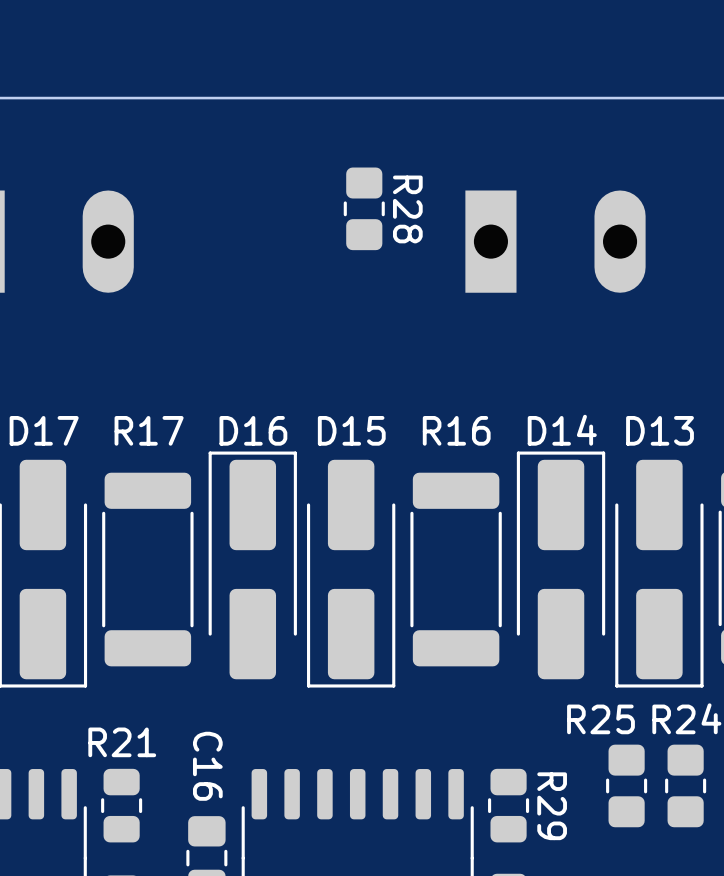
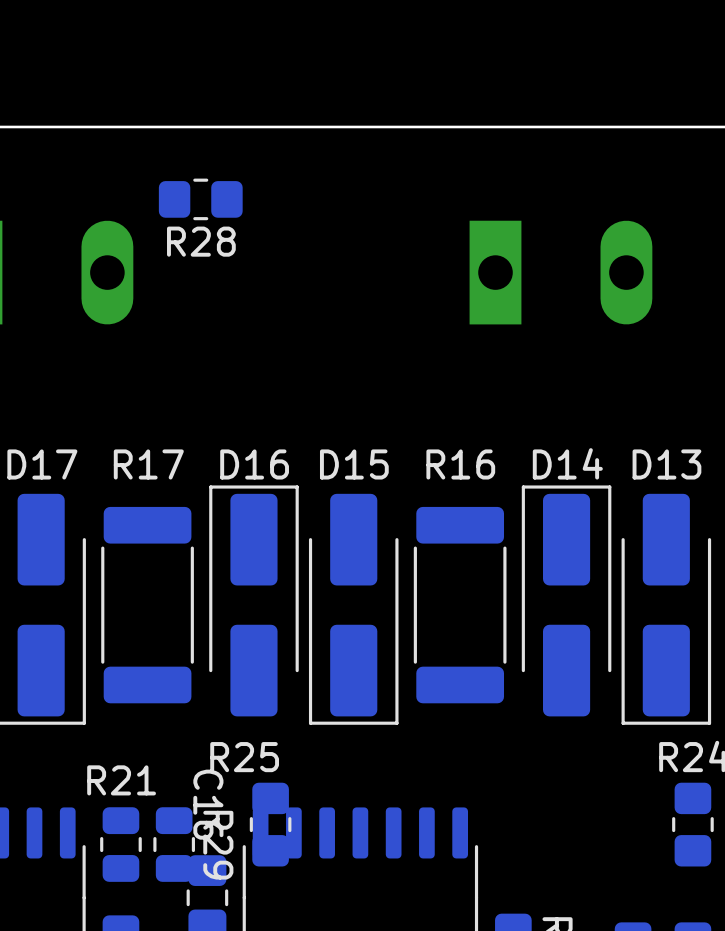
R28 rotation: 0° (364, 208) -> 90° clockwise (200, 199)
R28 position: (364, 208) -> (200, 199)
R25 position: (626, 785) -> (270, 824)
R29 position: (508, 805) -> (174, 844)

